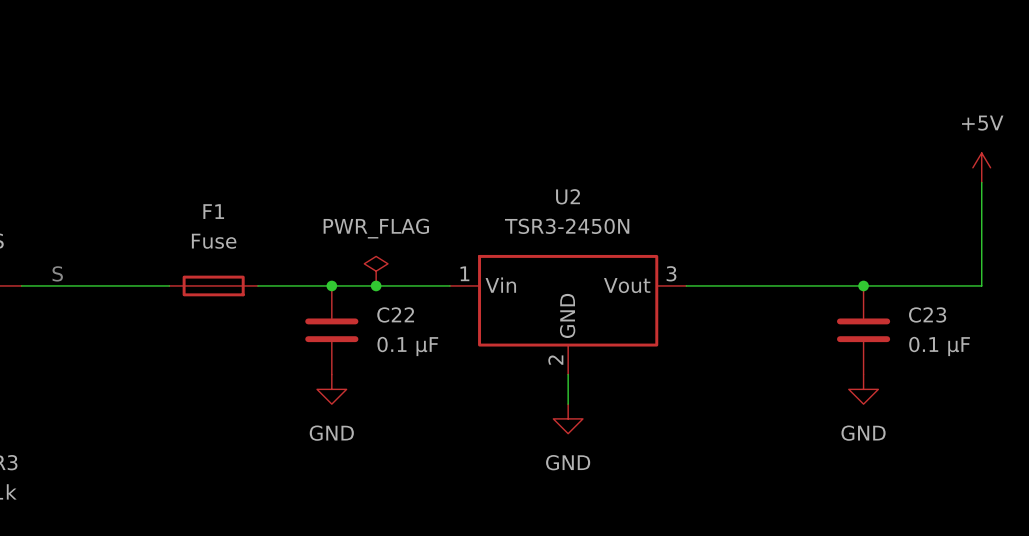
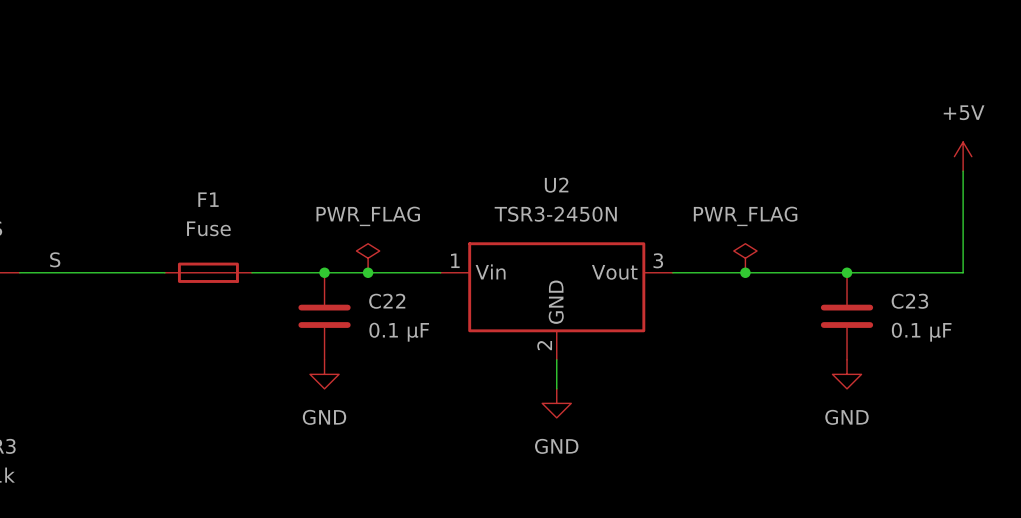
power symbol: none -> PWR_FLAG (745, 258)
label: none -> S (55, 259)
text: S (57, 273) -> none
junction: none -> (745, 272)

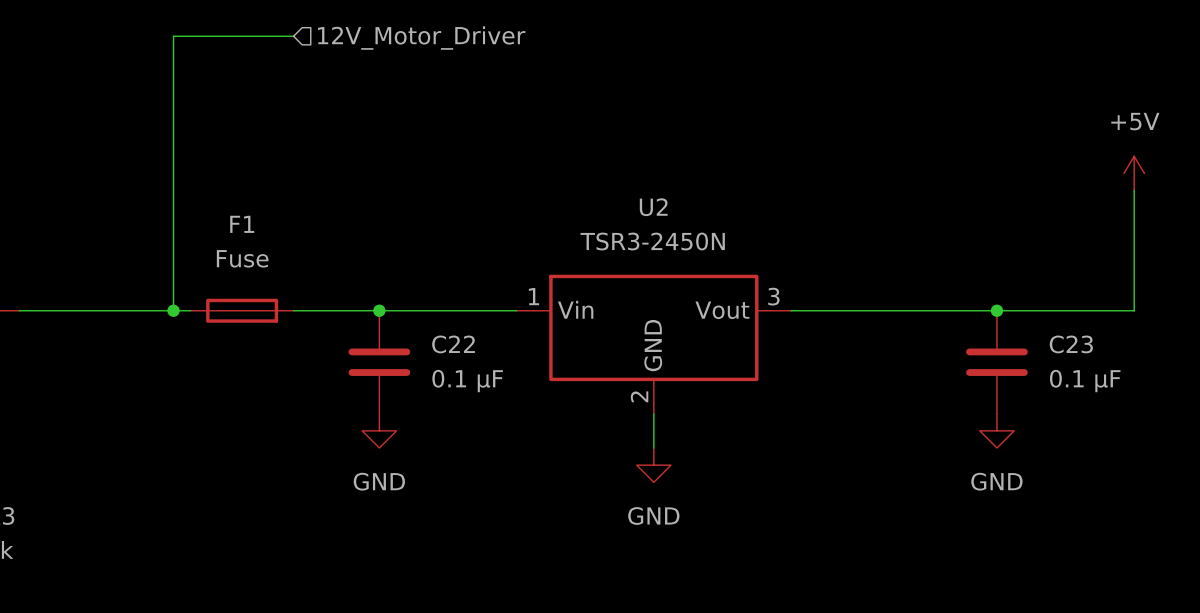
wire: none -> (293, 36) (173, 36) (173, 310)
hierarchical label: none -> 12V_Motor_Driver (421, 38)
power symbol: PWR_FLAG (368, 258) -> none
power symbol: PWR_FLAG (745, 258) -> none
label: S (55, 259) -> none
junction: none -> (173, 310)
junction: (368, 272) -> none
junction: (745, 272) -> none

